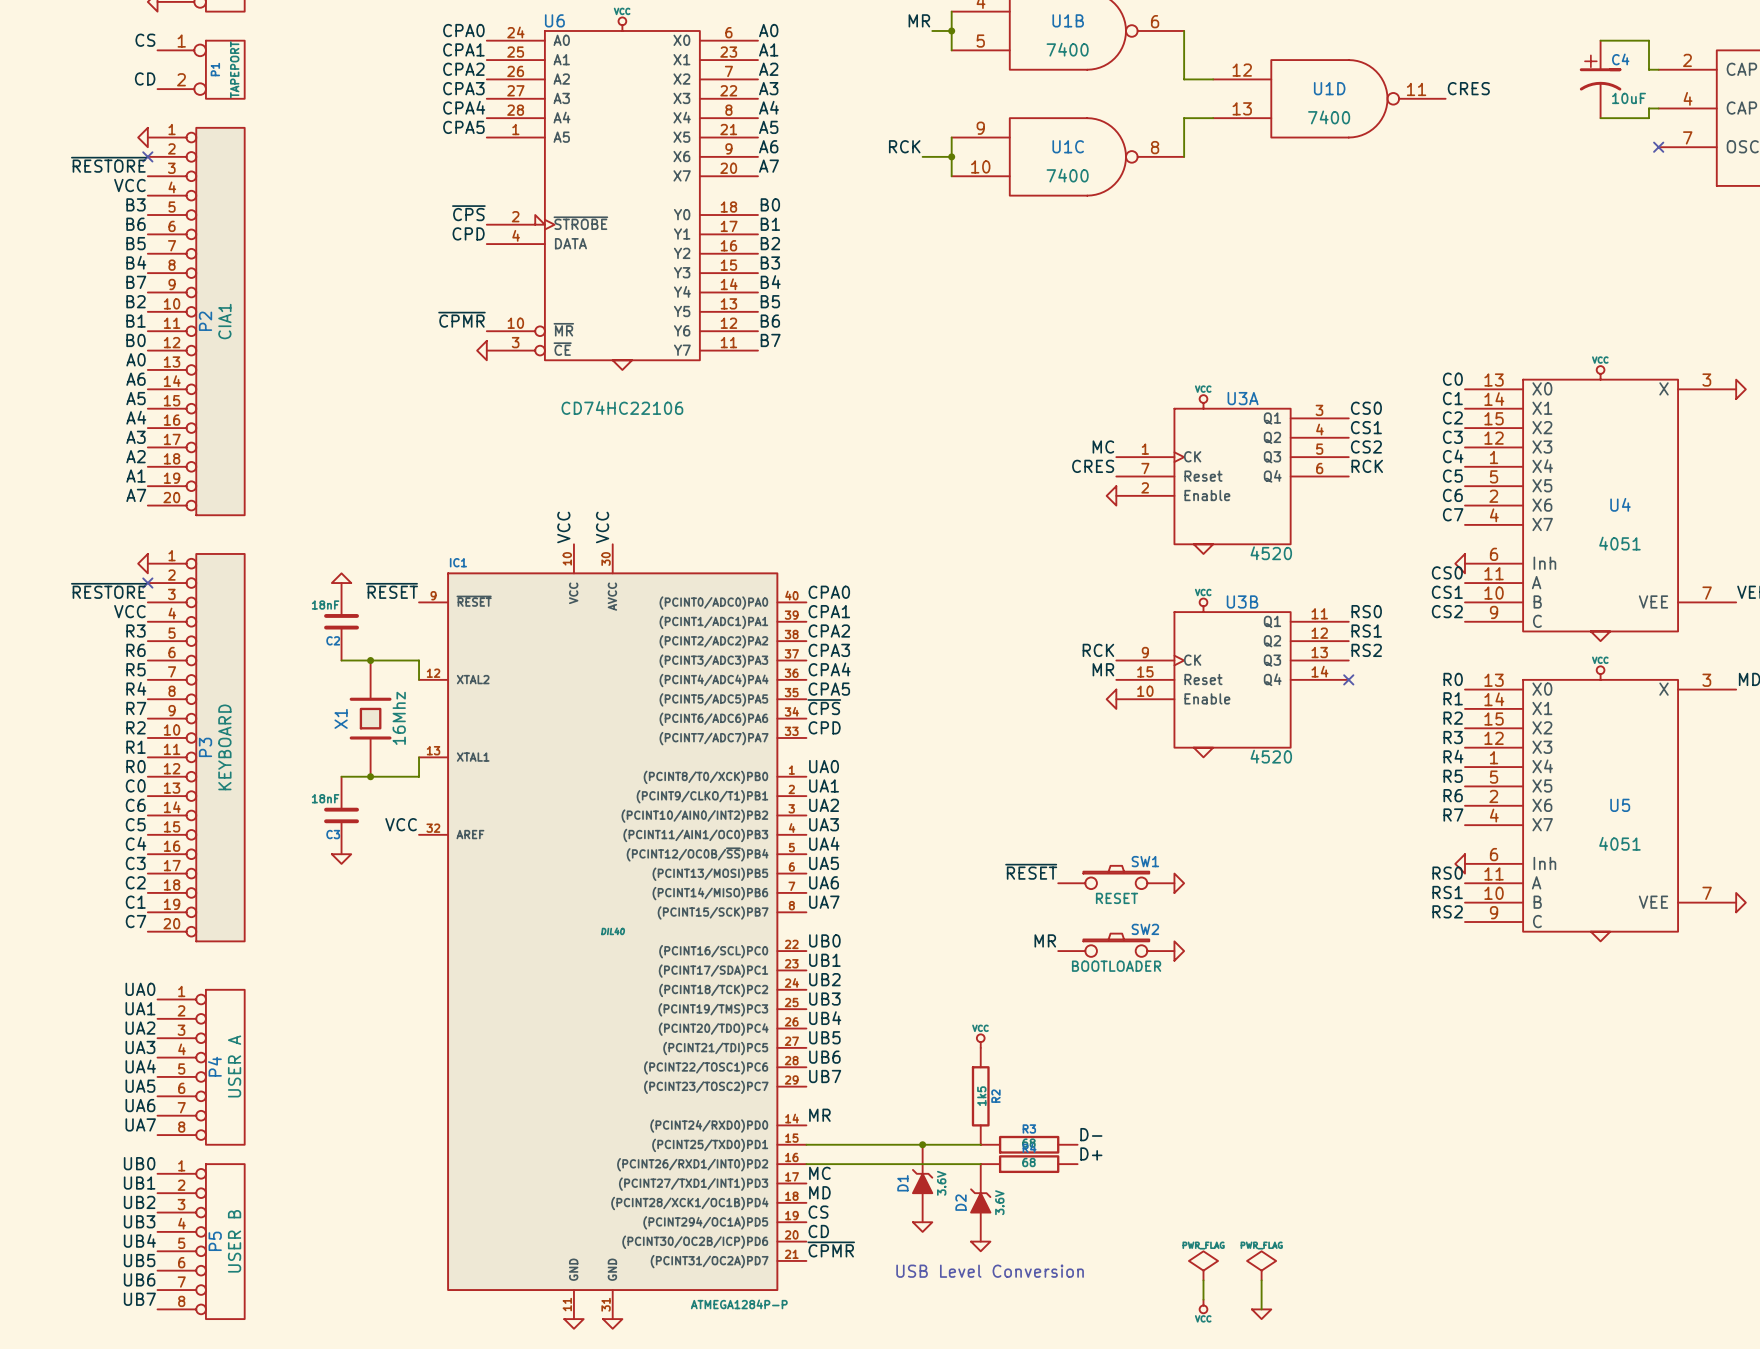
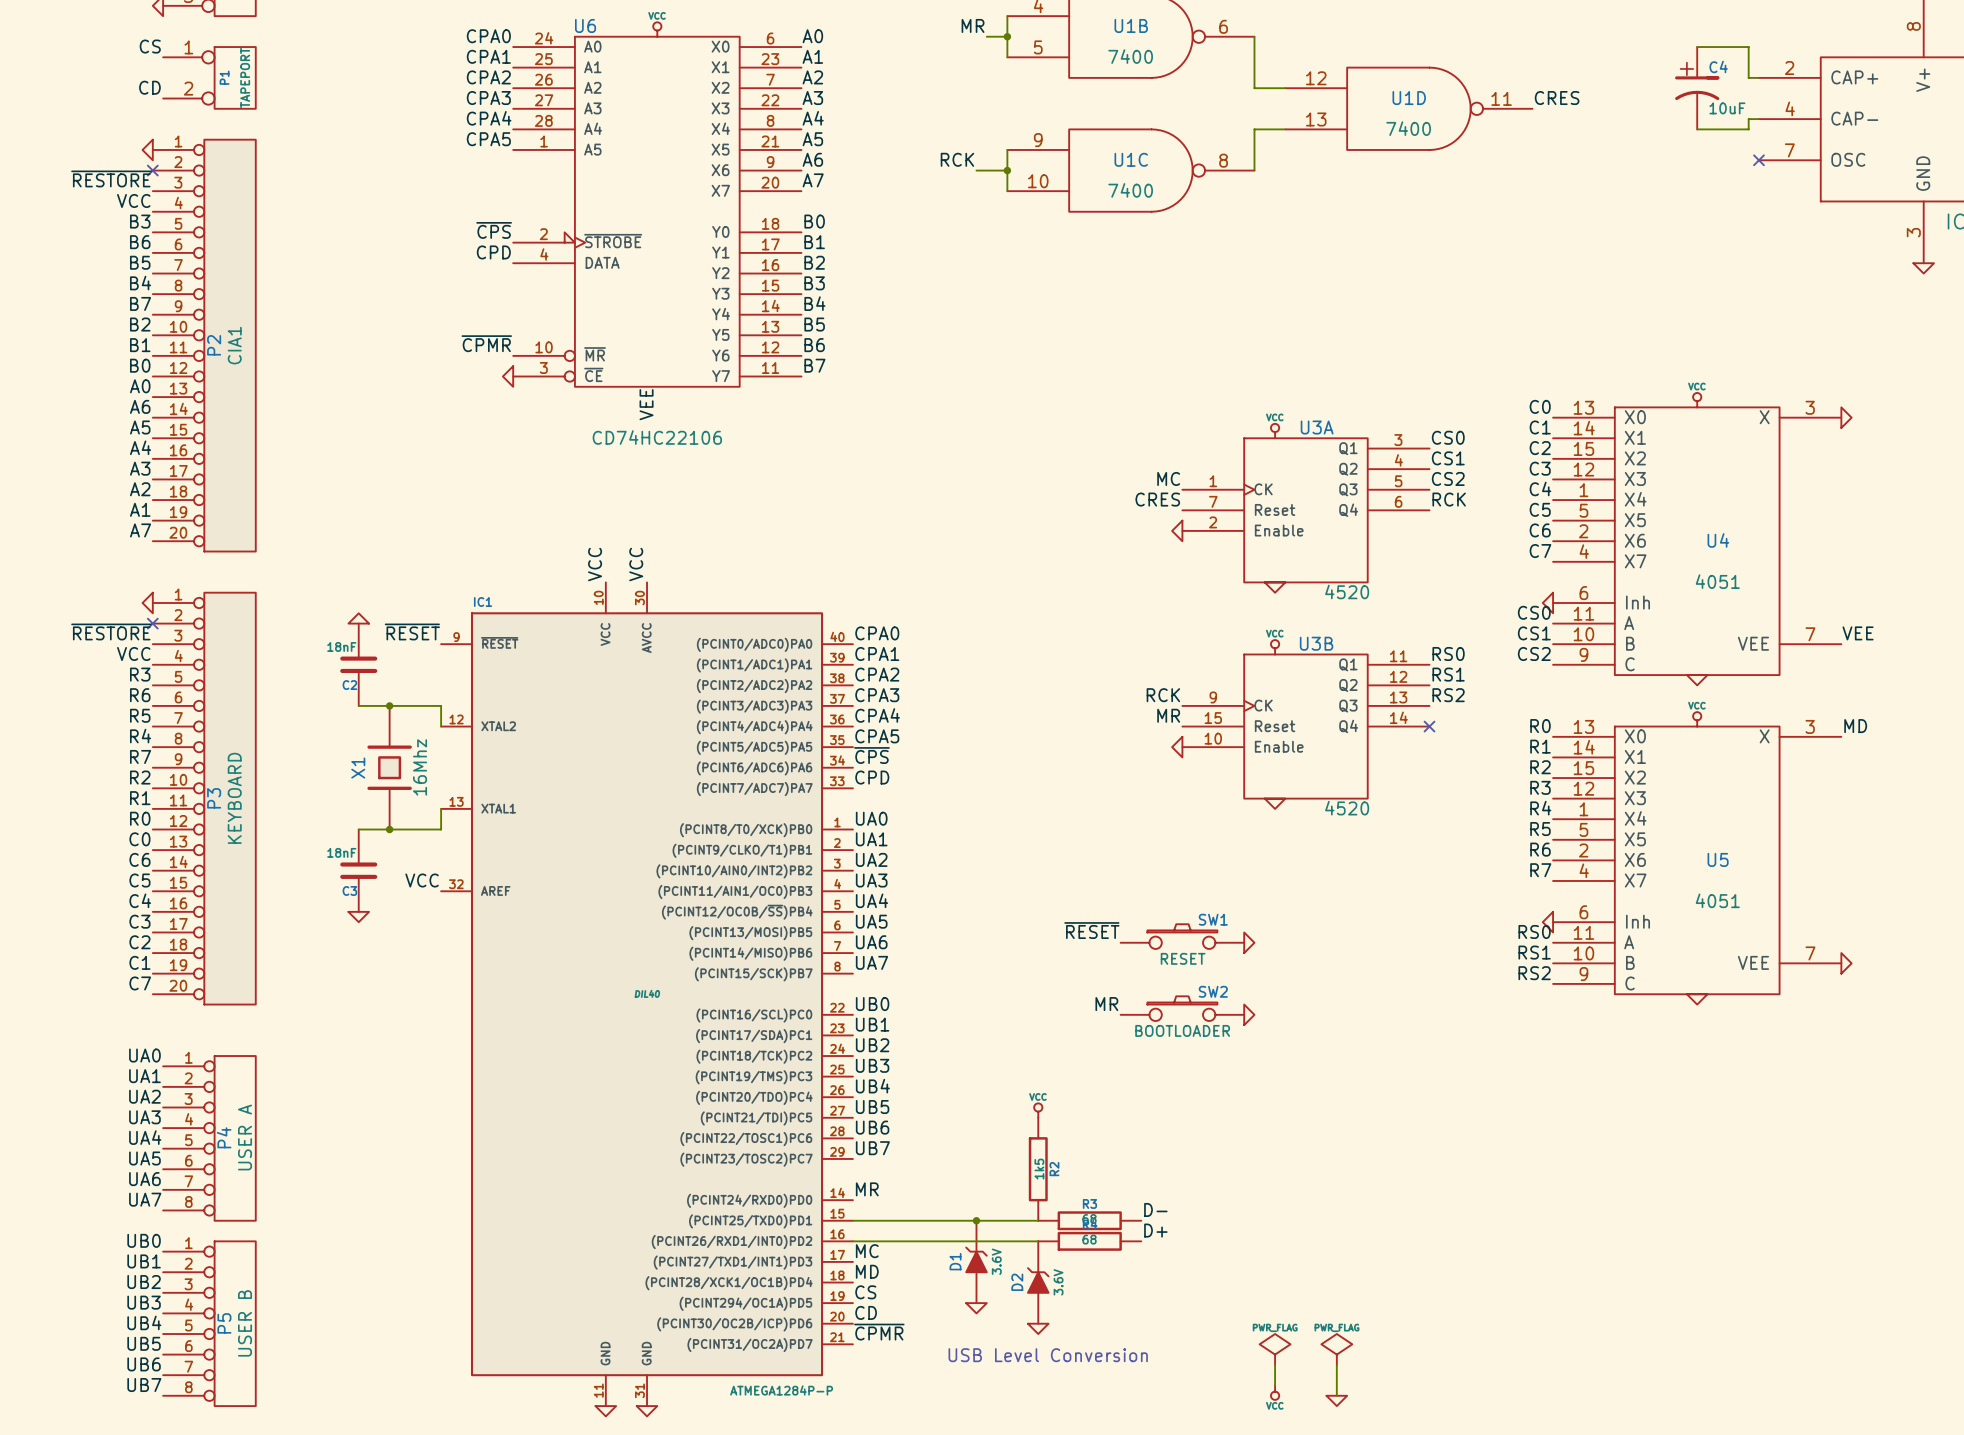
power symbol: (622, 365) -> none
label: none -> VEE (646, 404)

